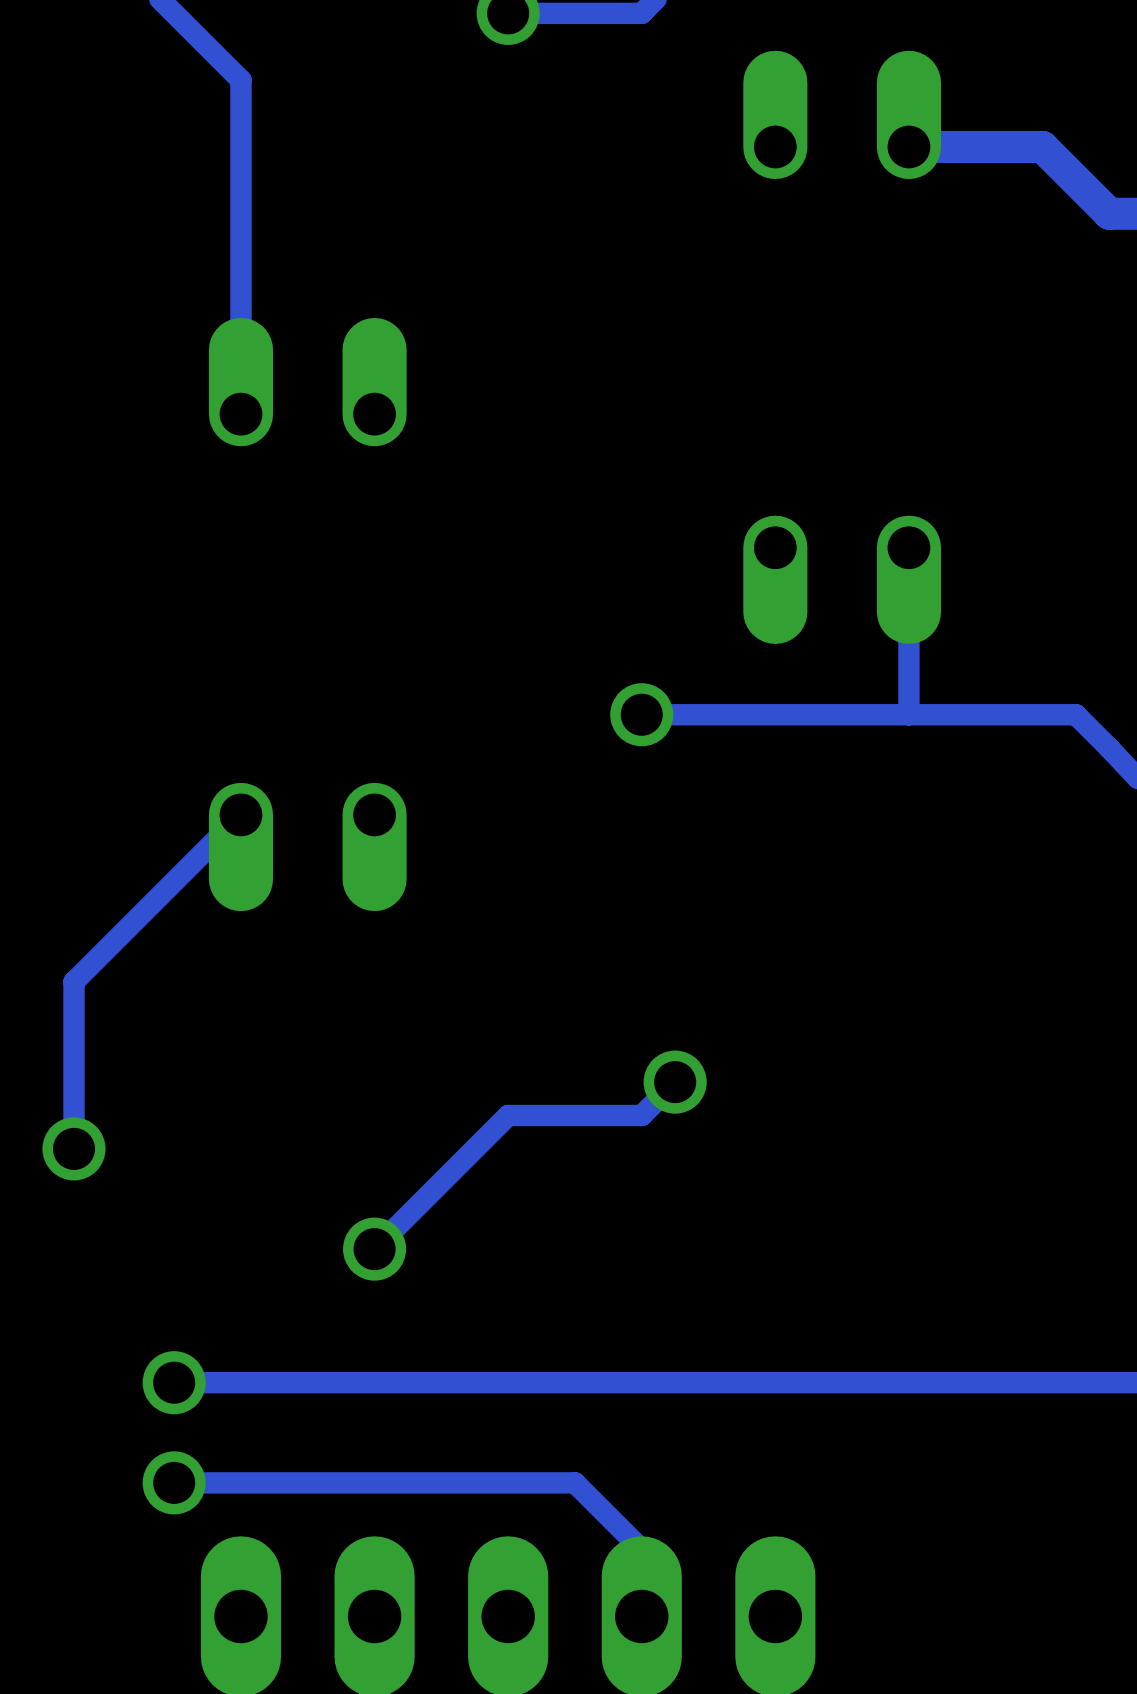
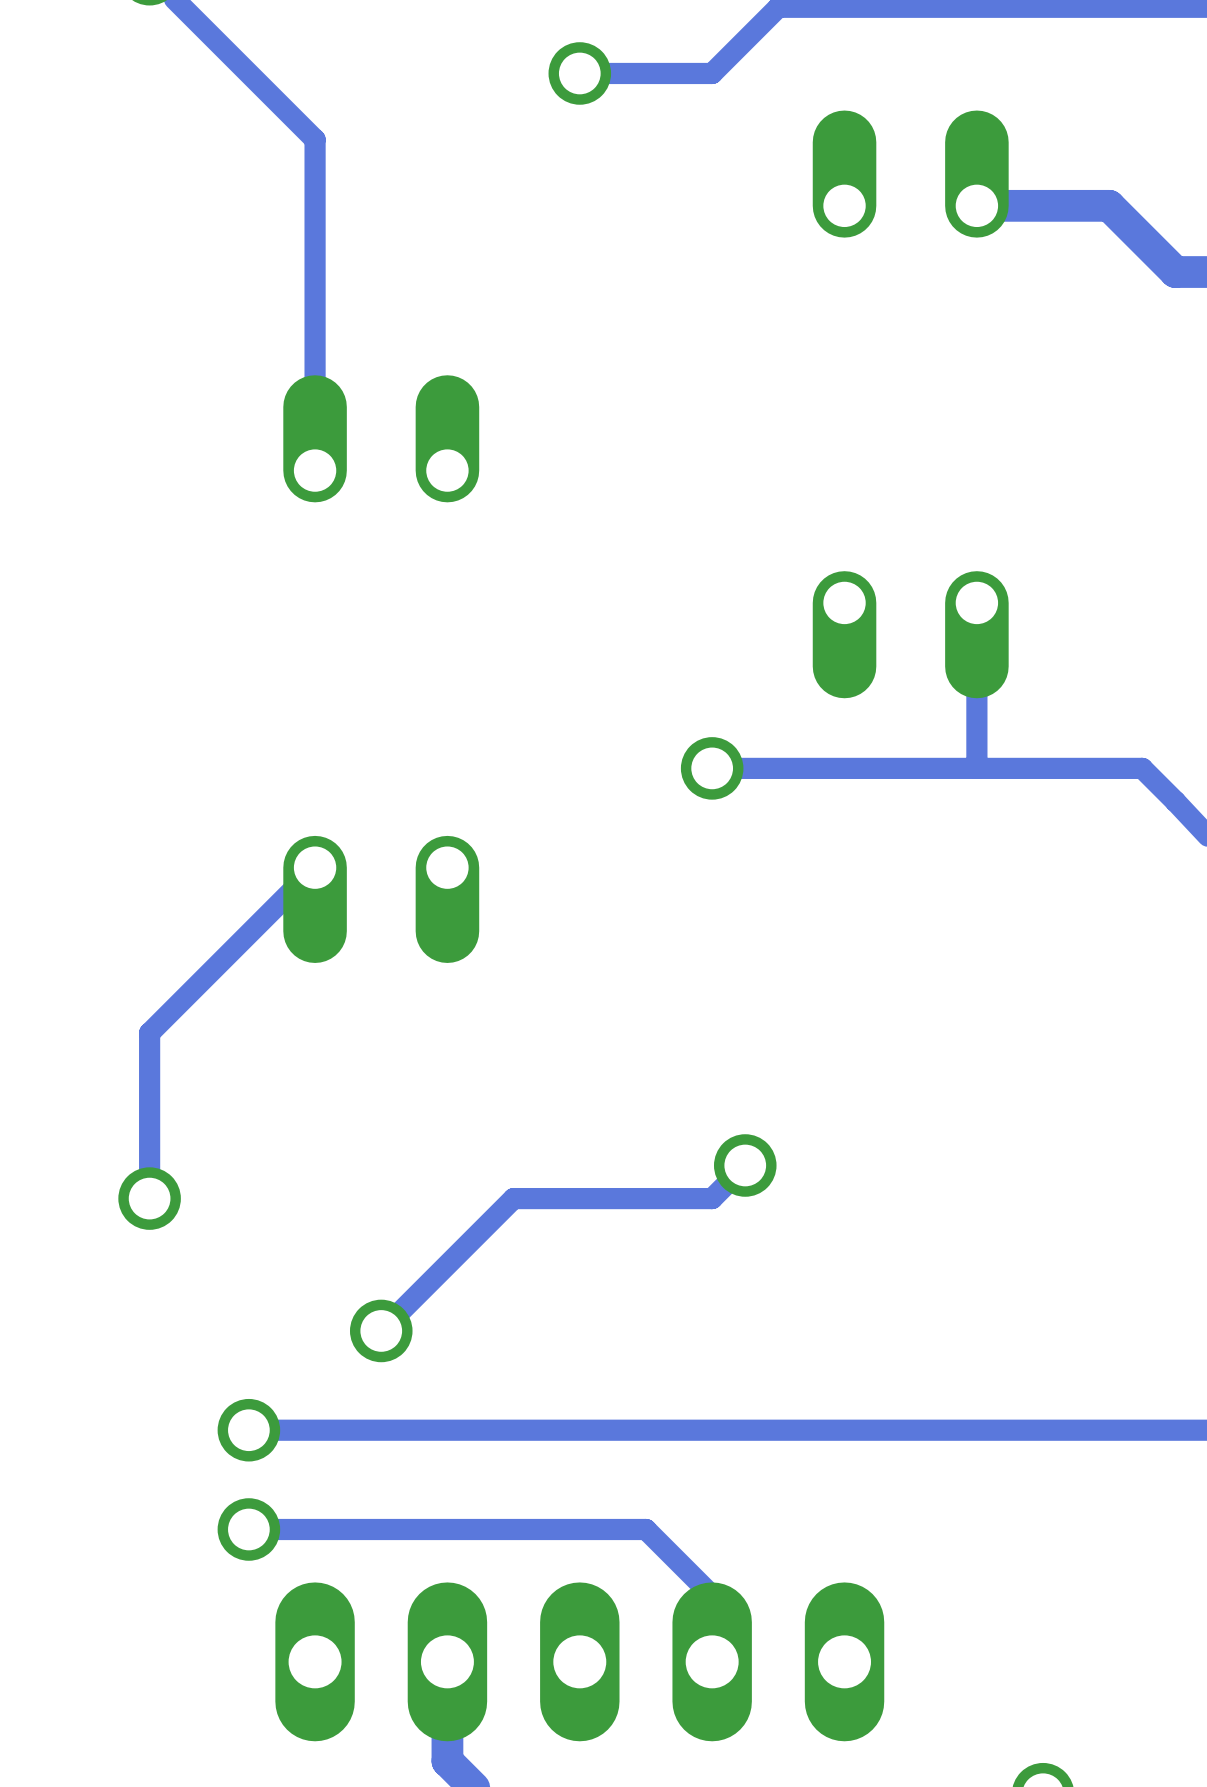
track: (675, 1082) (641, 1115) (508, 1115) (374, 1249) -> none
via position: (675, 1082) -> (745, 1165)
track: none -> (745, 1165) (712, 1198) (513, 1198) (381, 1330)
via position: (374, 1249) -> (381, 1330)

